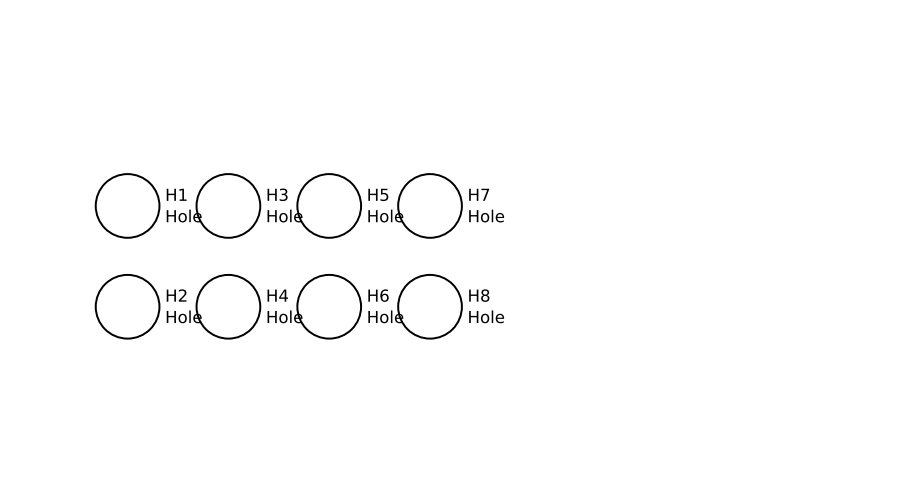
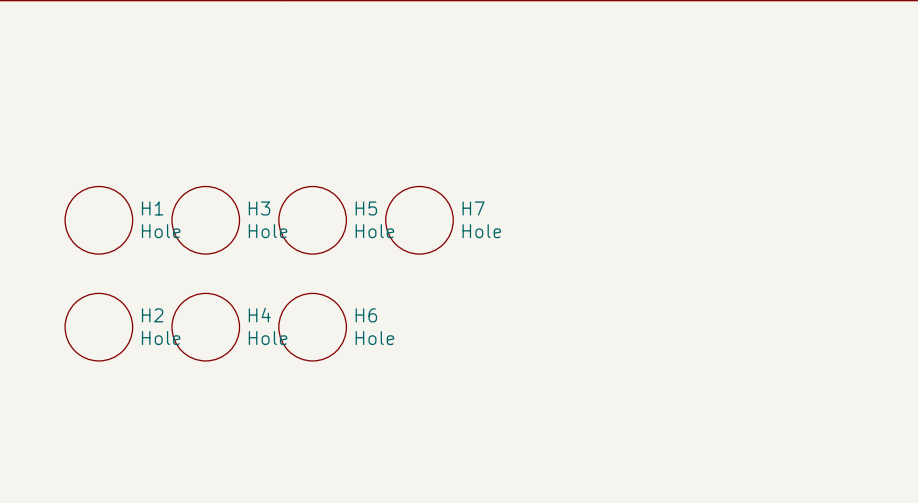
H8: Hole (430, 306) -> none

